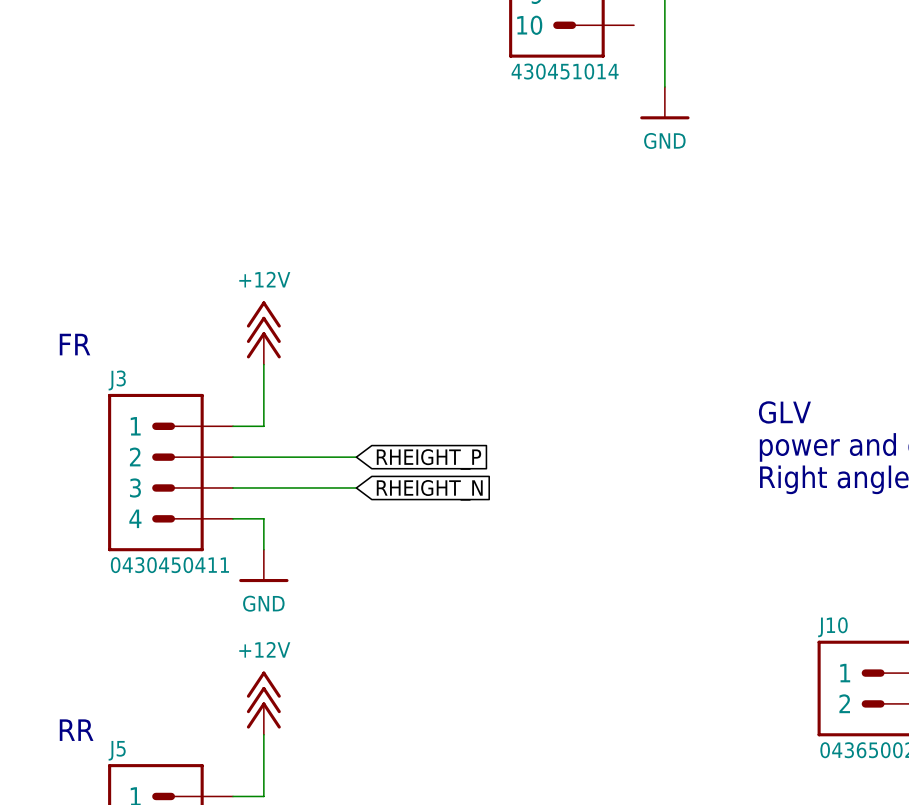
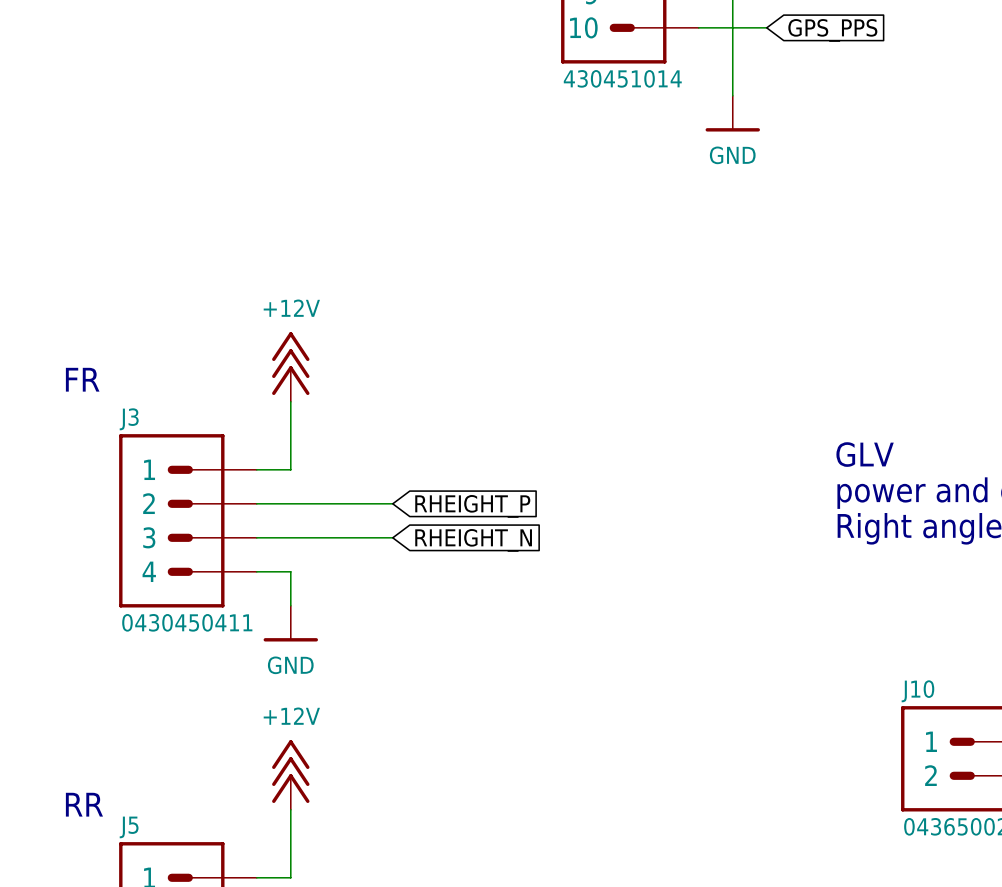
wire: none -> (698, 27) (766, 27)
global label: none -> GPS_PPS (832, 30)

